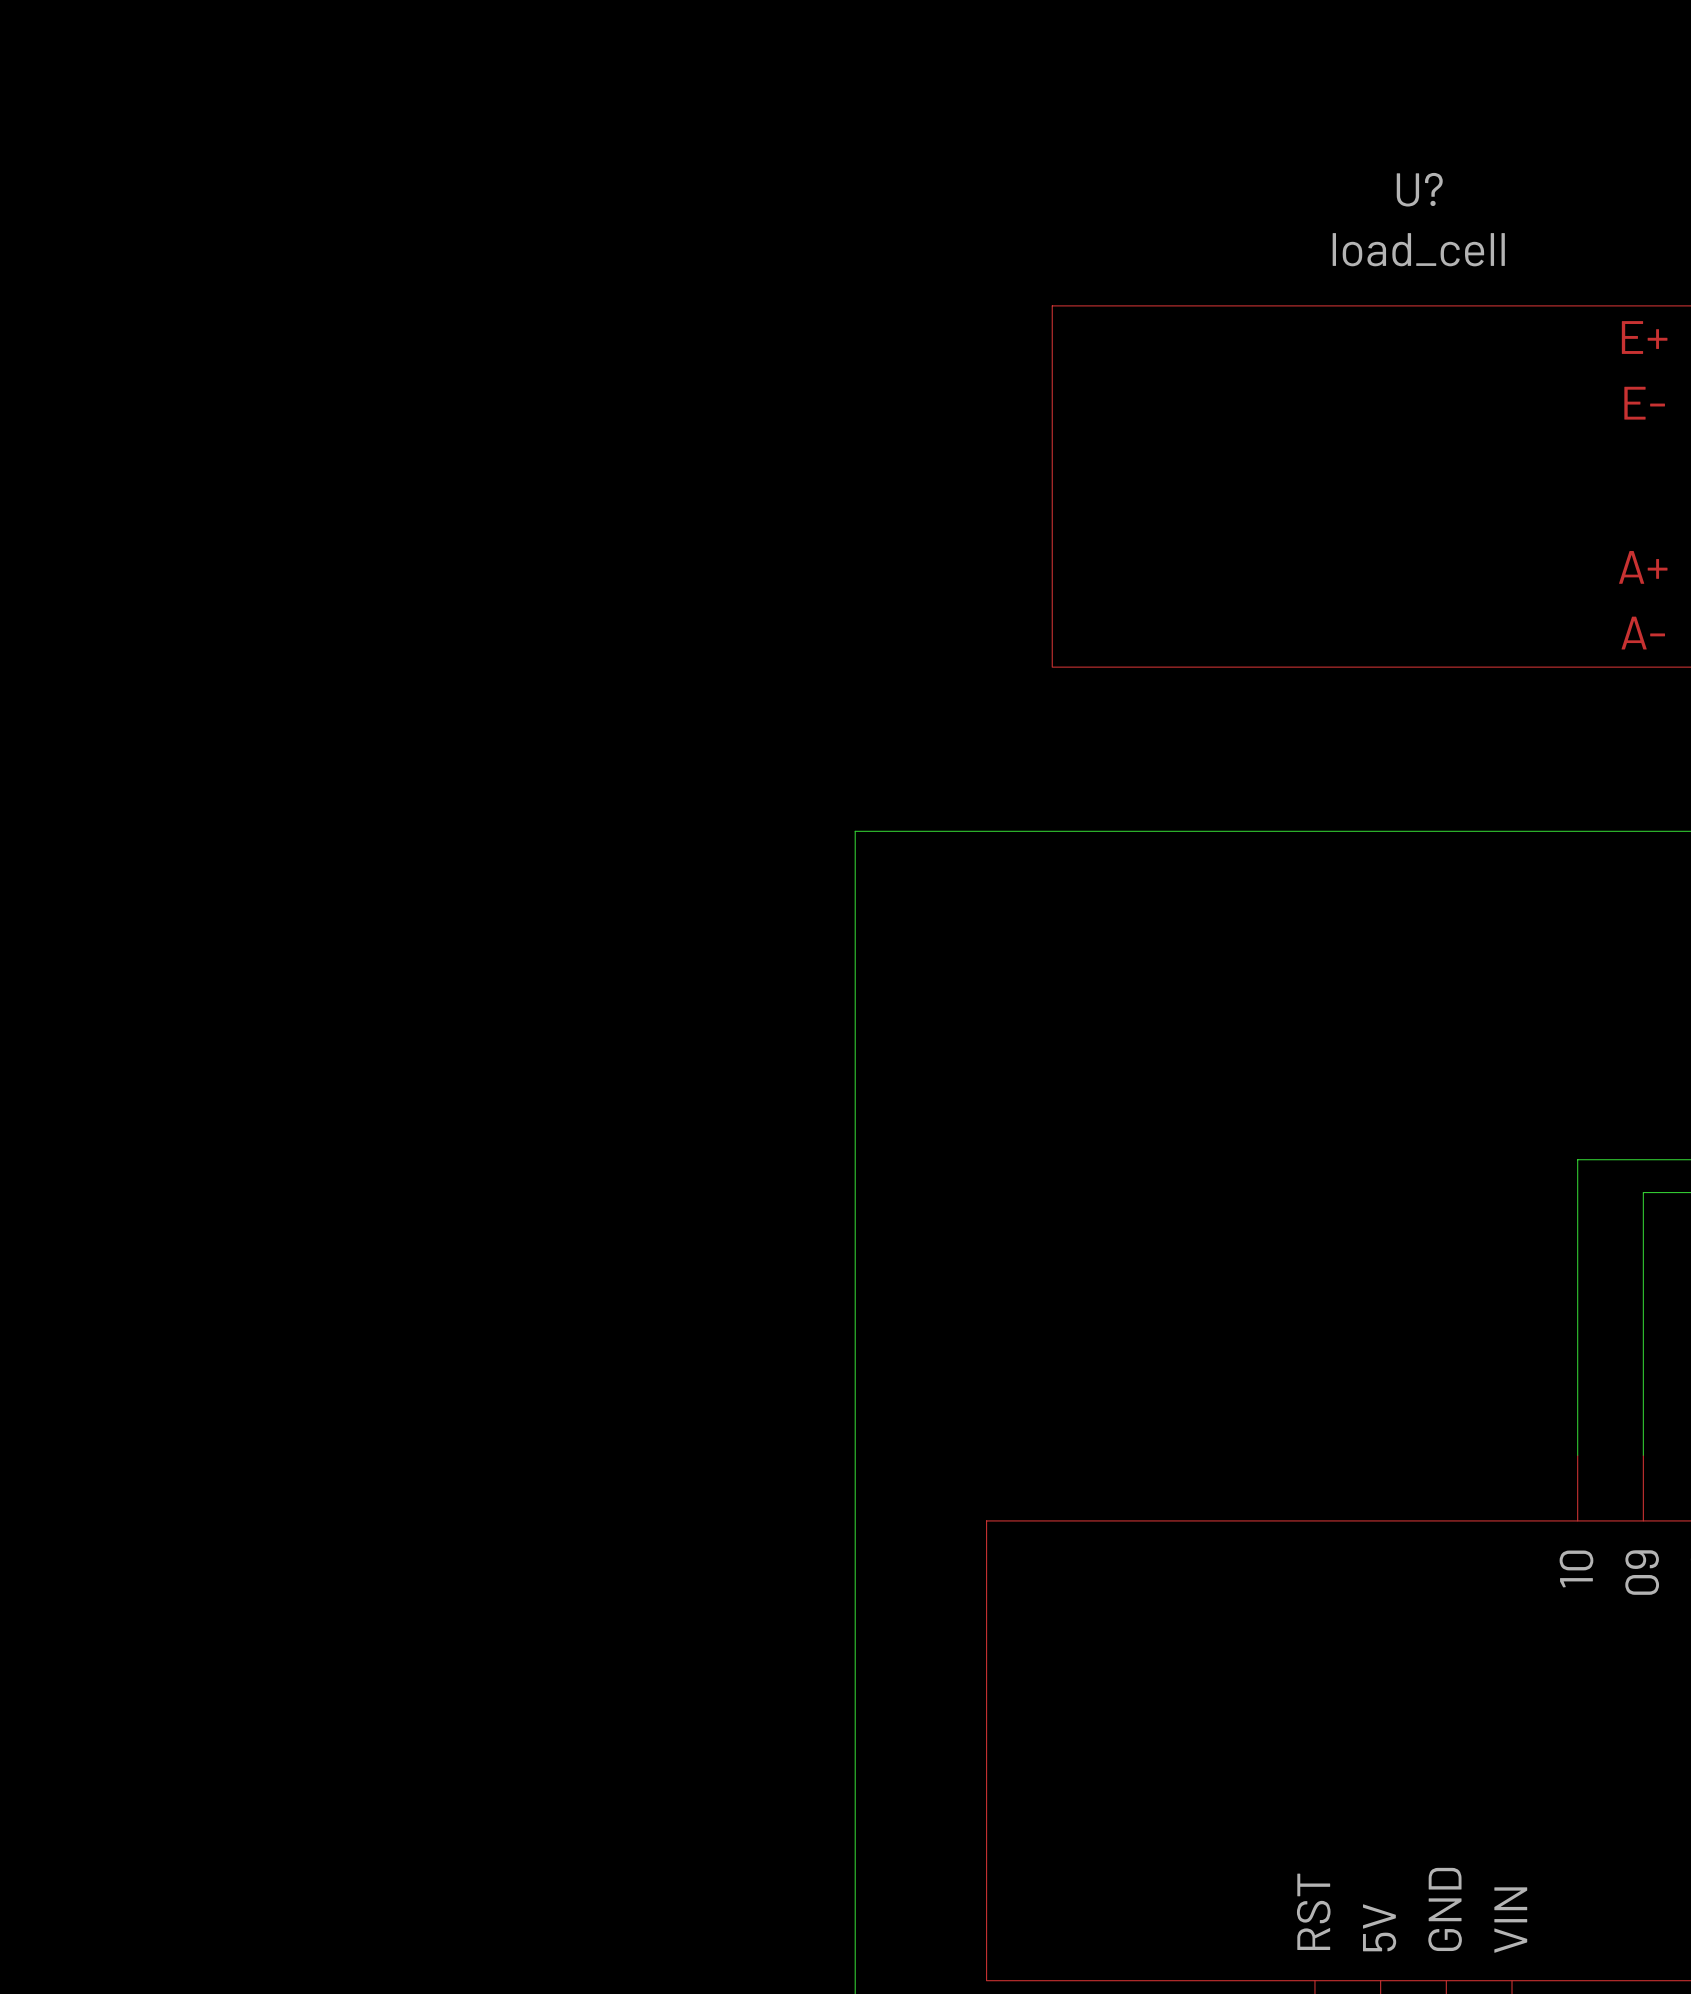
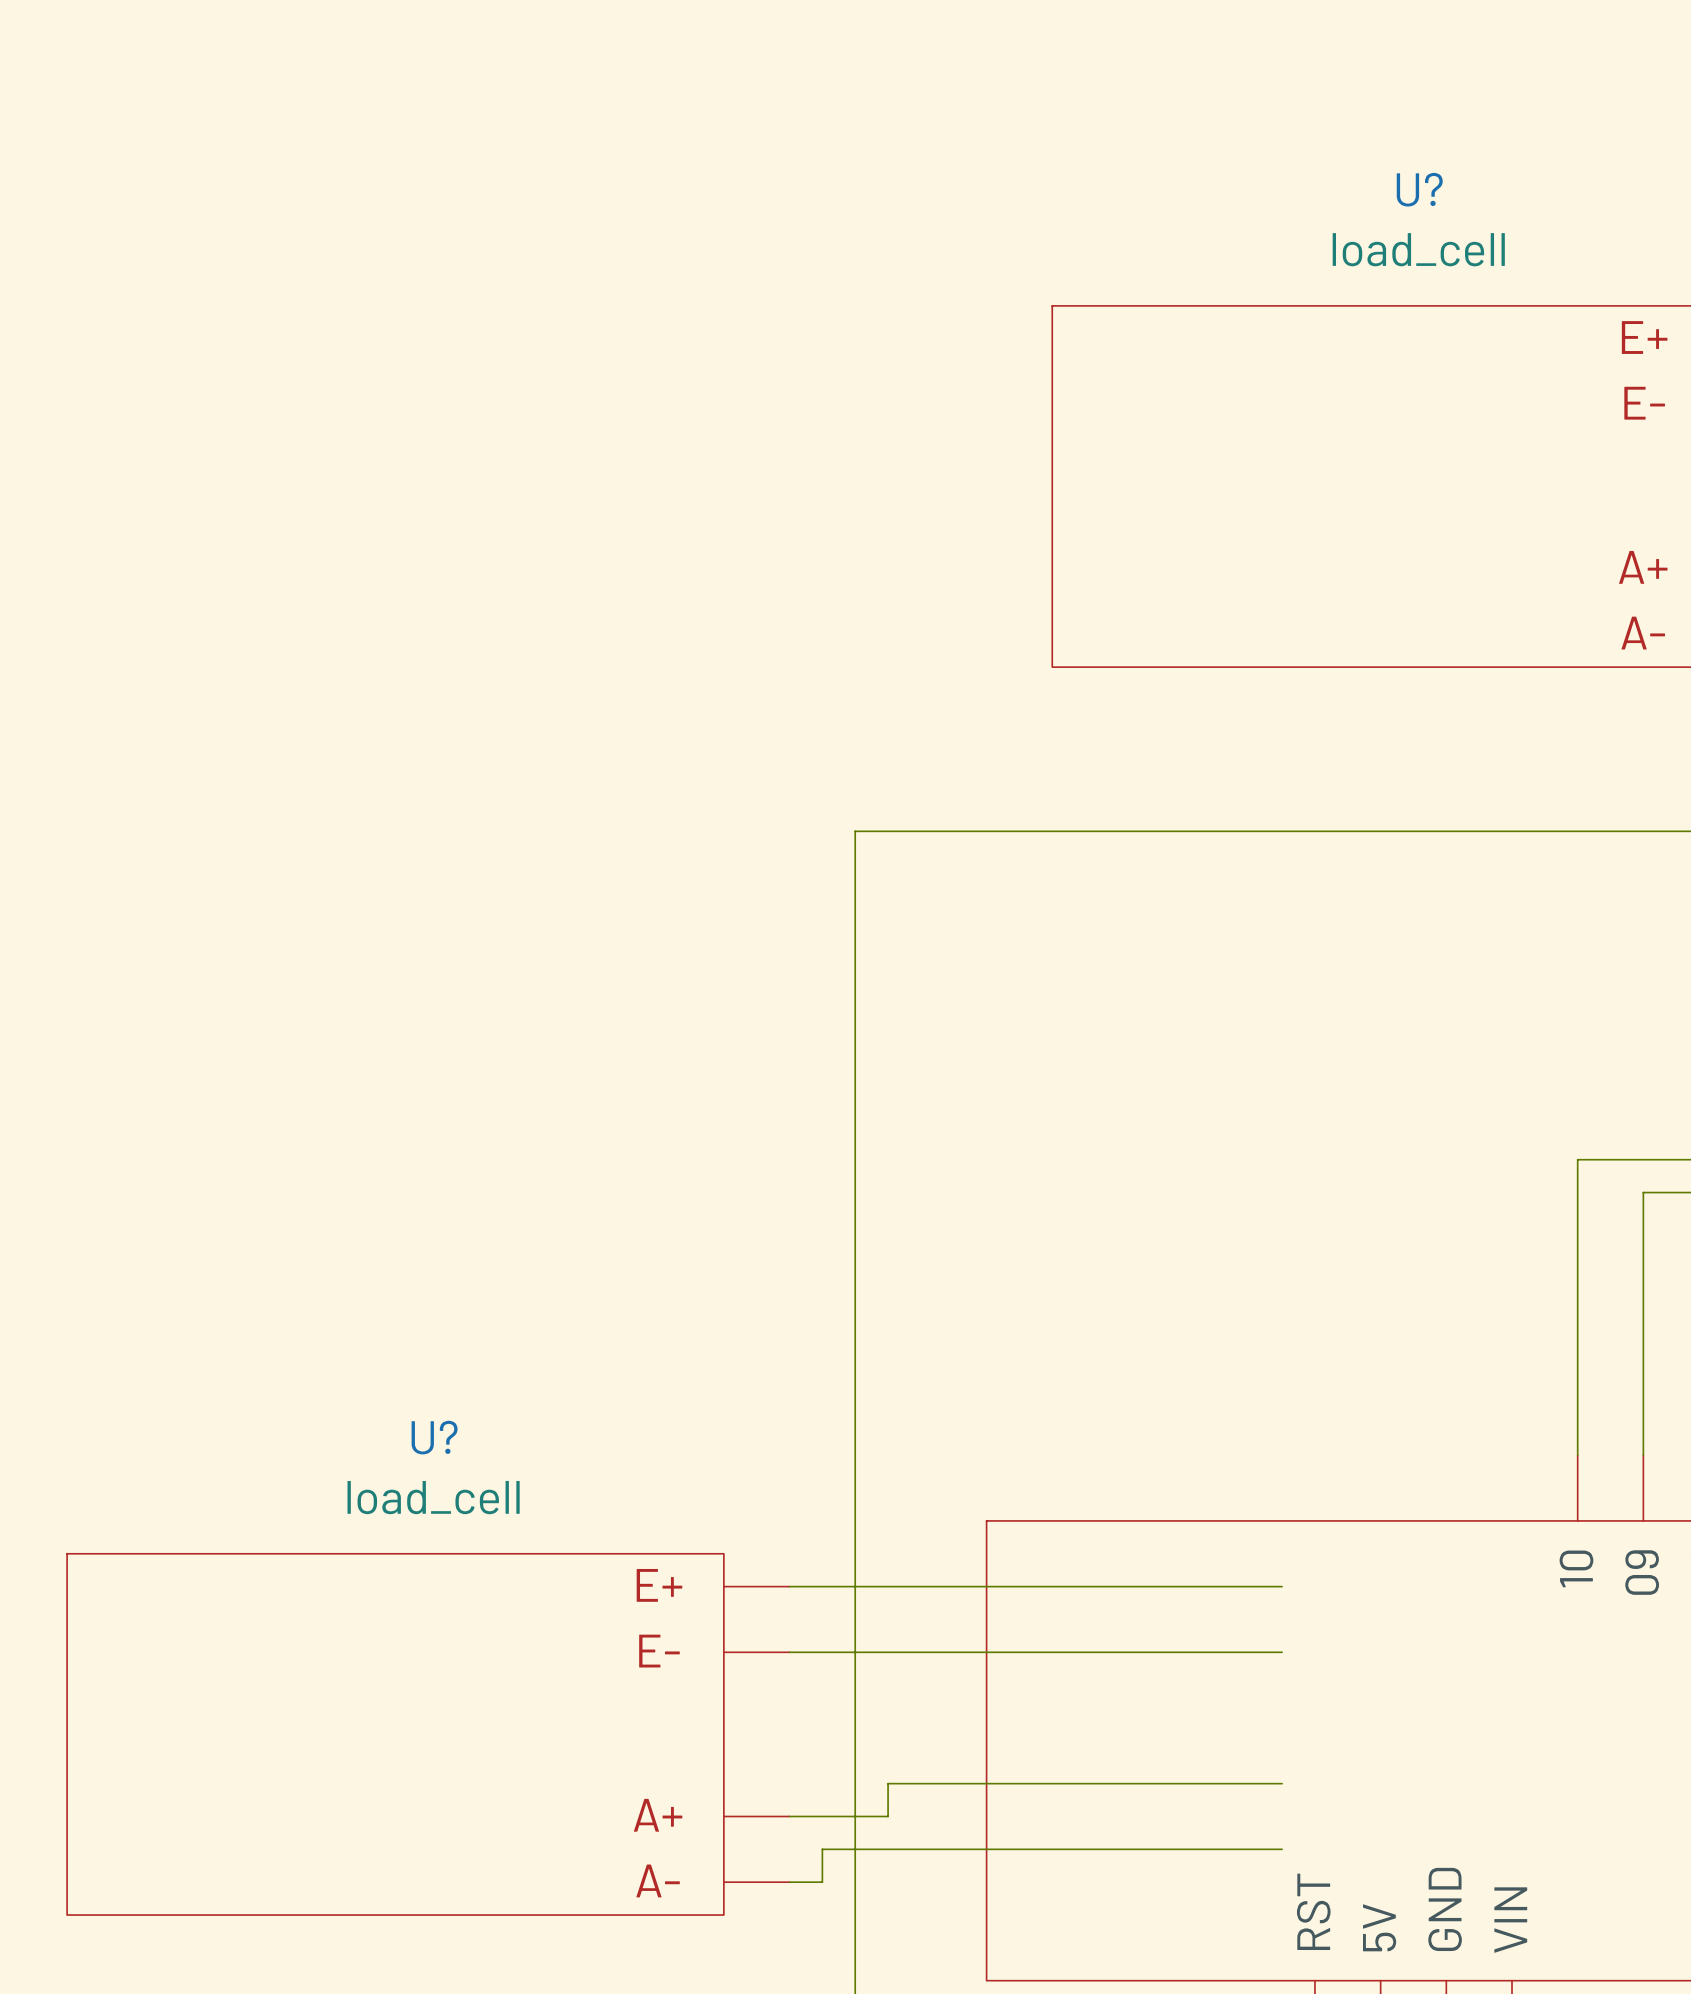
wire: none -> (789, 1586) (1282, 1586)
wire: none -> (789, 1652) (1282, 1652)
U?: none -> load_cell (428, 1734)
wire: none -> (1282, 1783) (888, 1783) (888, 1816) (789, 1816)
wire: none -> (1282, 1849) (822, 1849) (822, 1882) (789, 1882)

